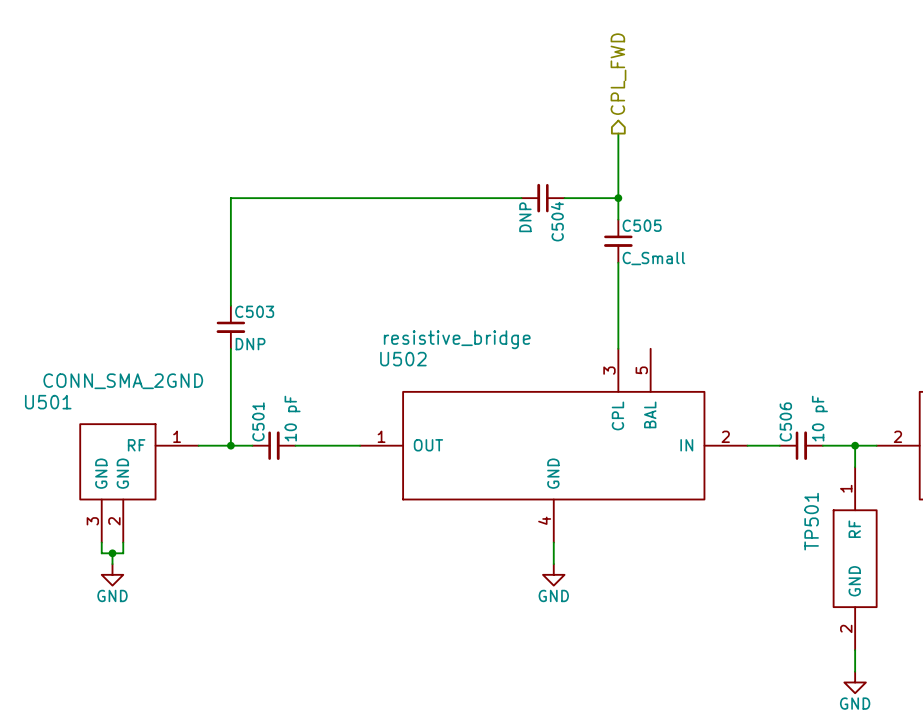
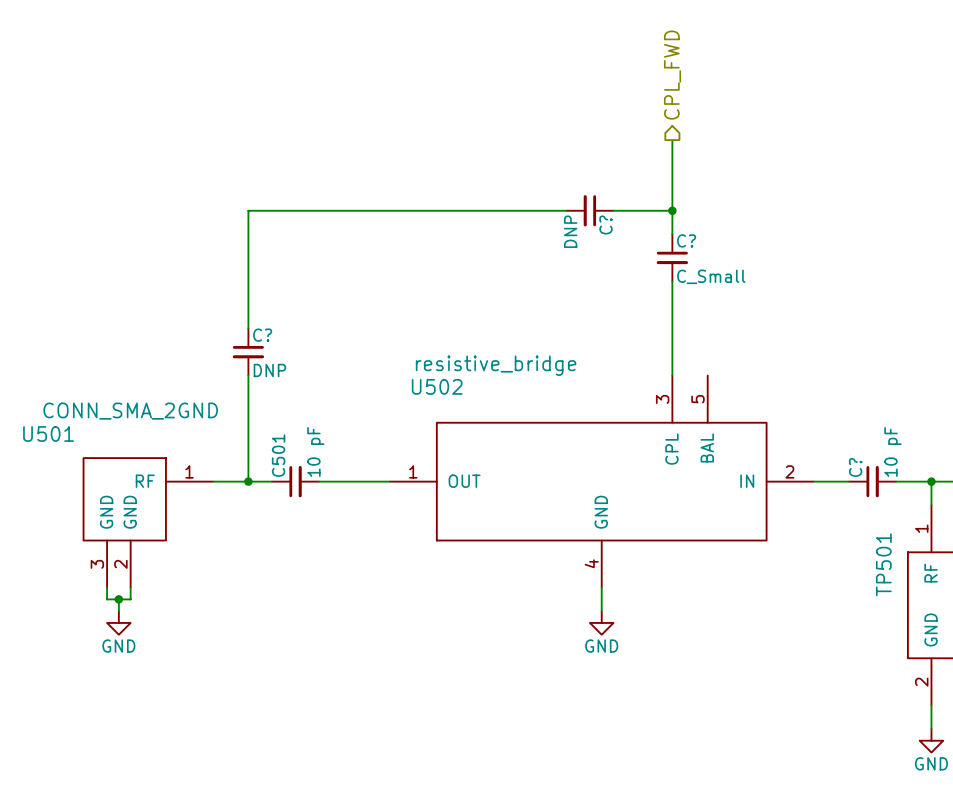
C504 name: C504 (557, 221) -> C? (605, 224)
C505 name: C505 (642, 225) -> C? (686, 240)
C503 name: C503 (254, 311) -> C? (262, 335)
C506 name: C506 (785, 421) -> C? (855, 467)

